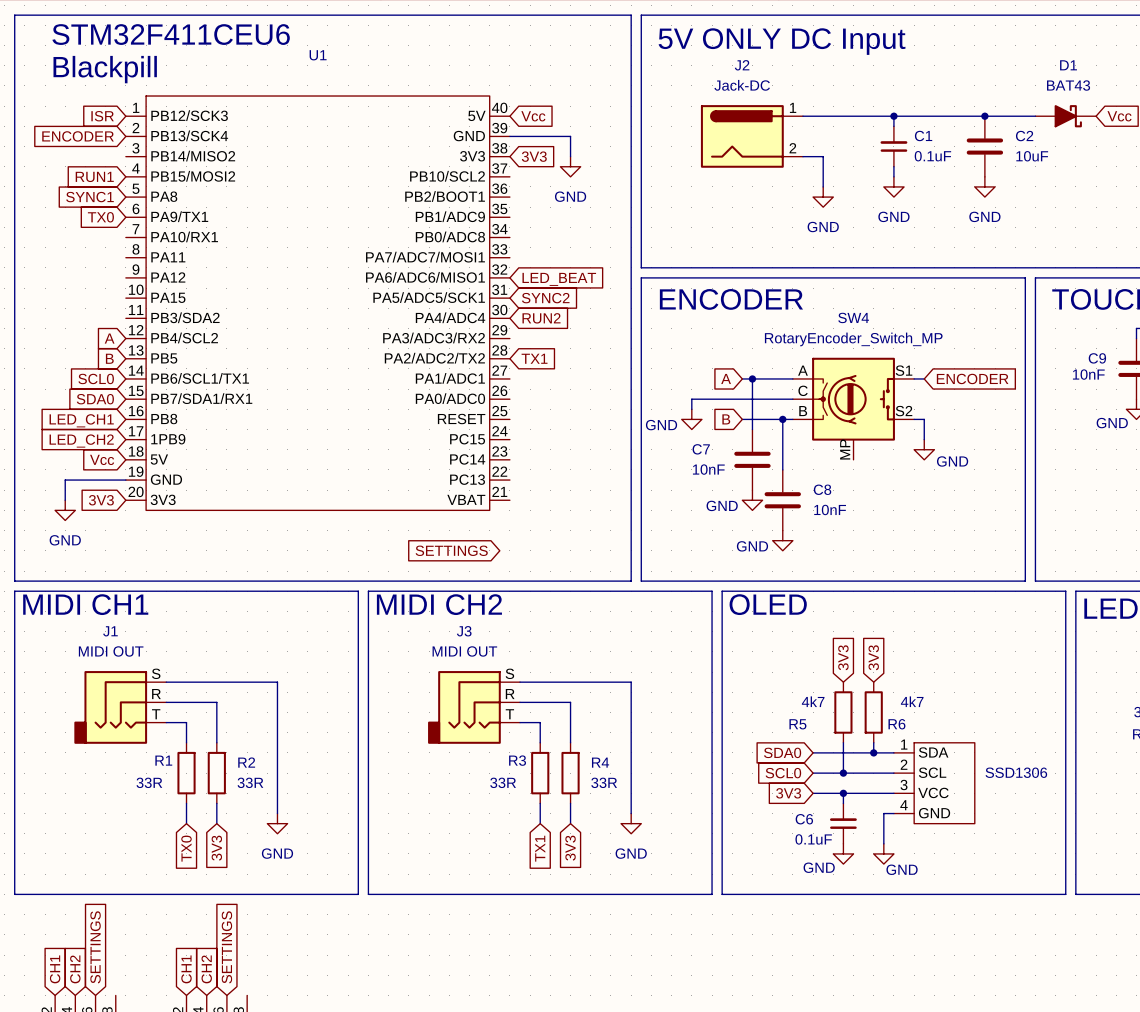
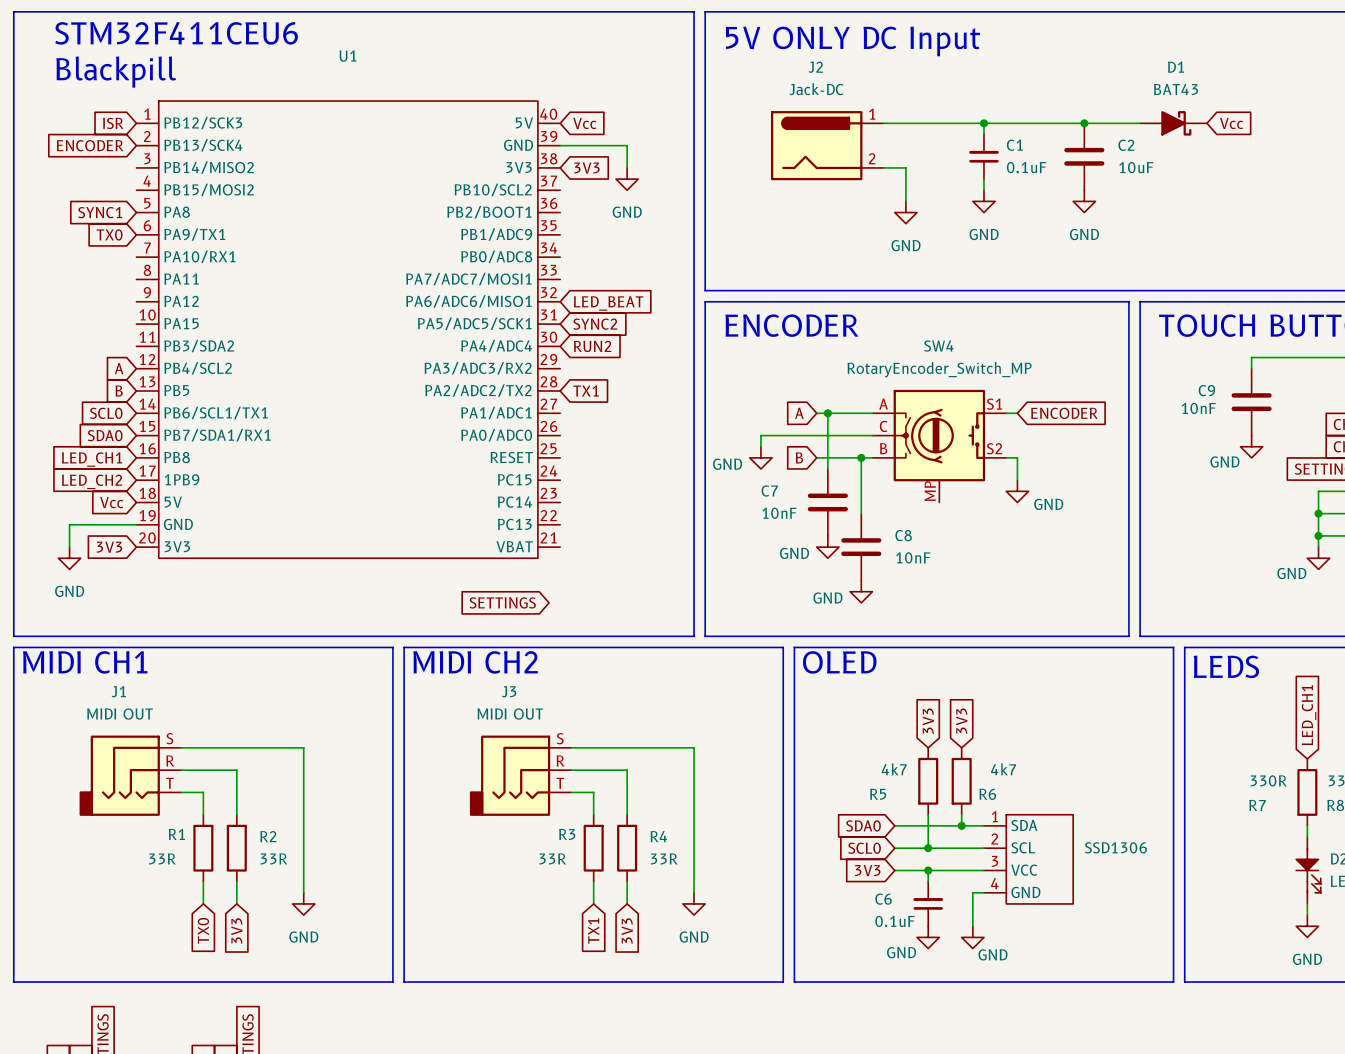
global label: RUN1 (94, 176) -> none

